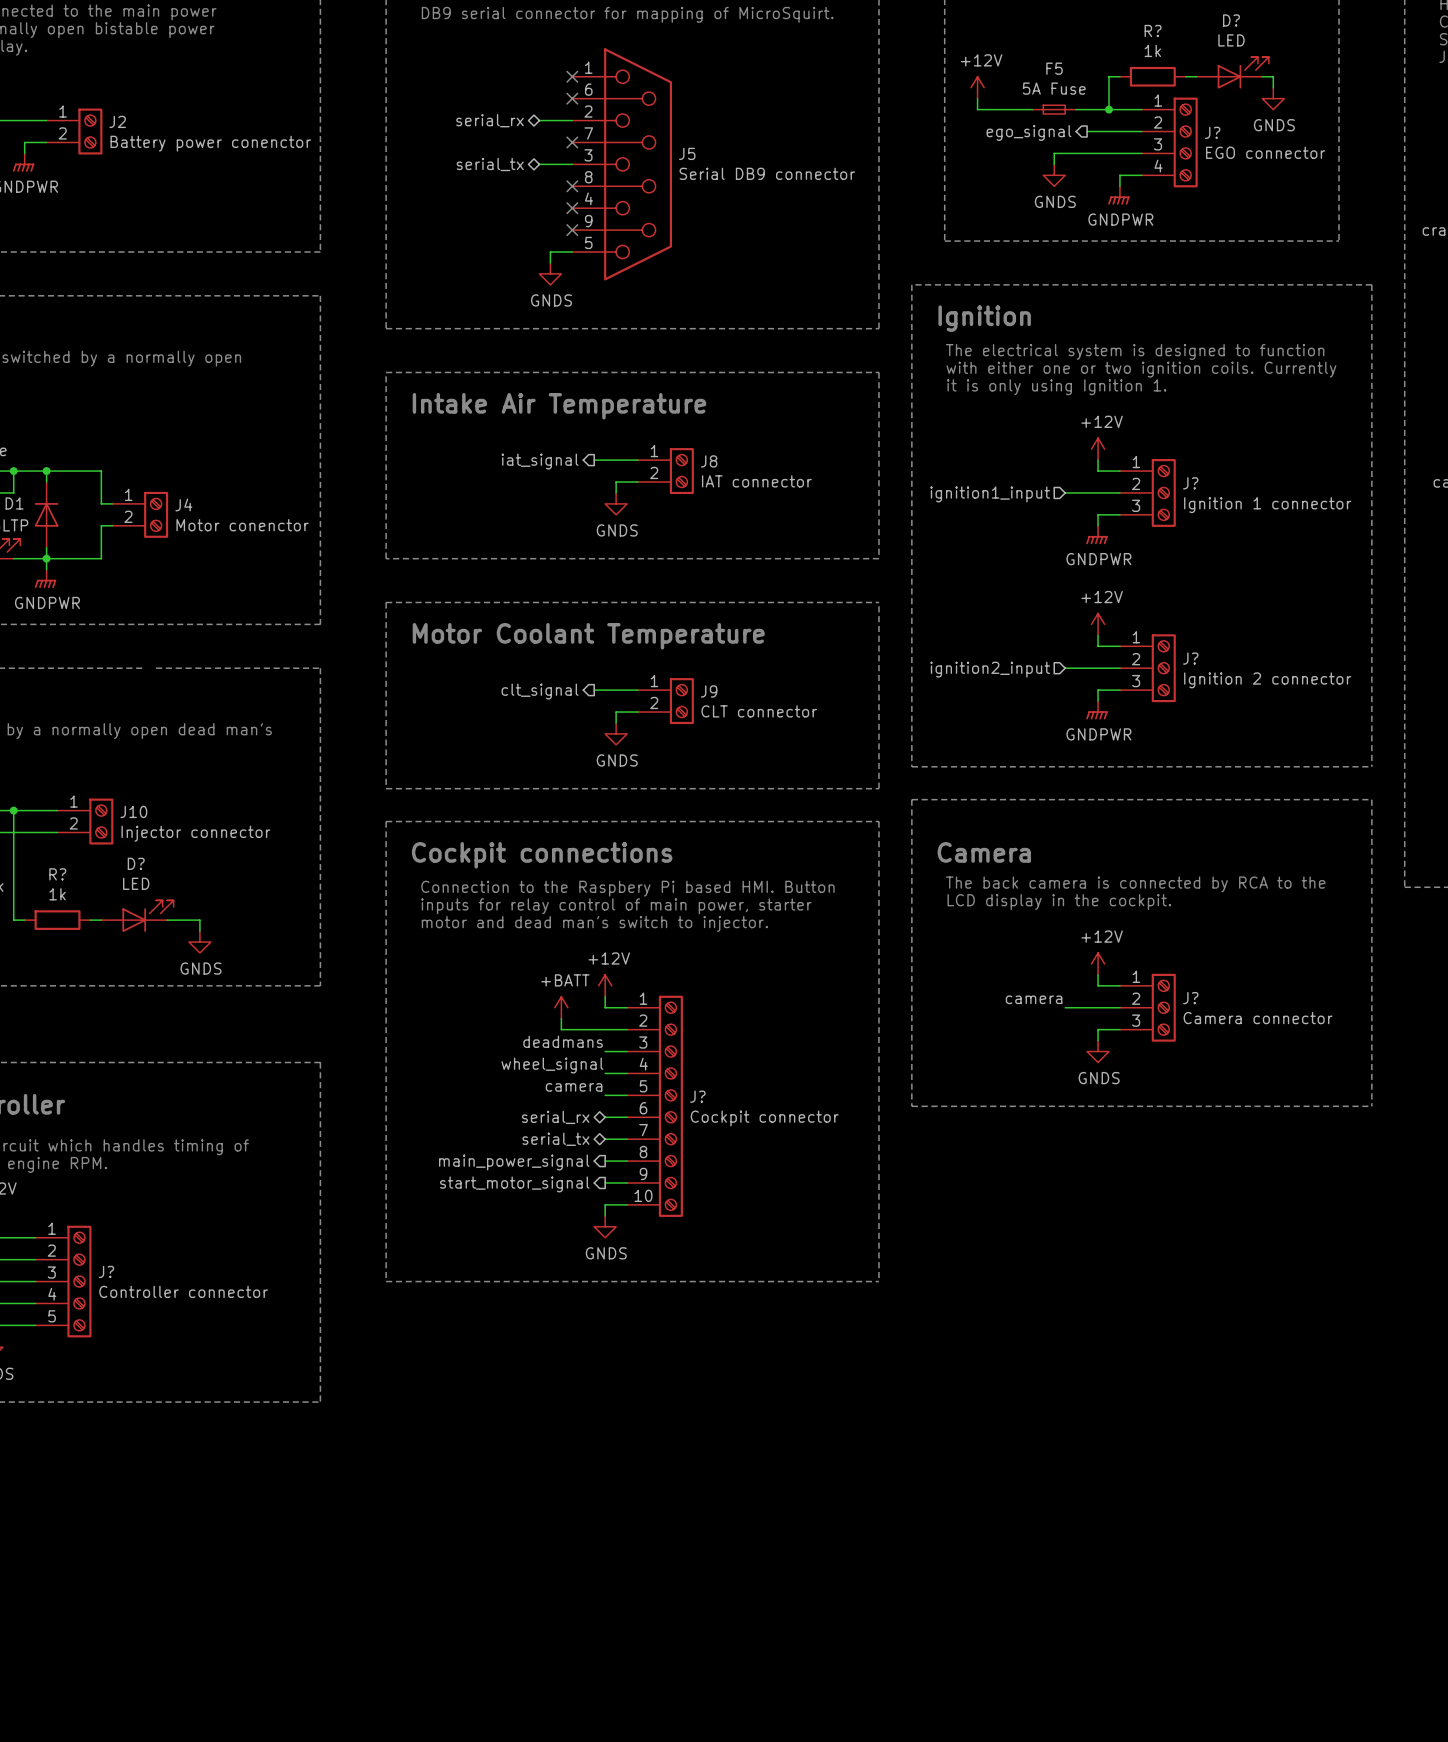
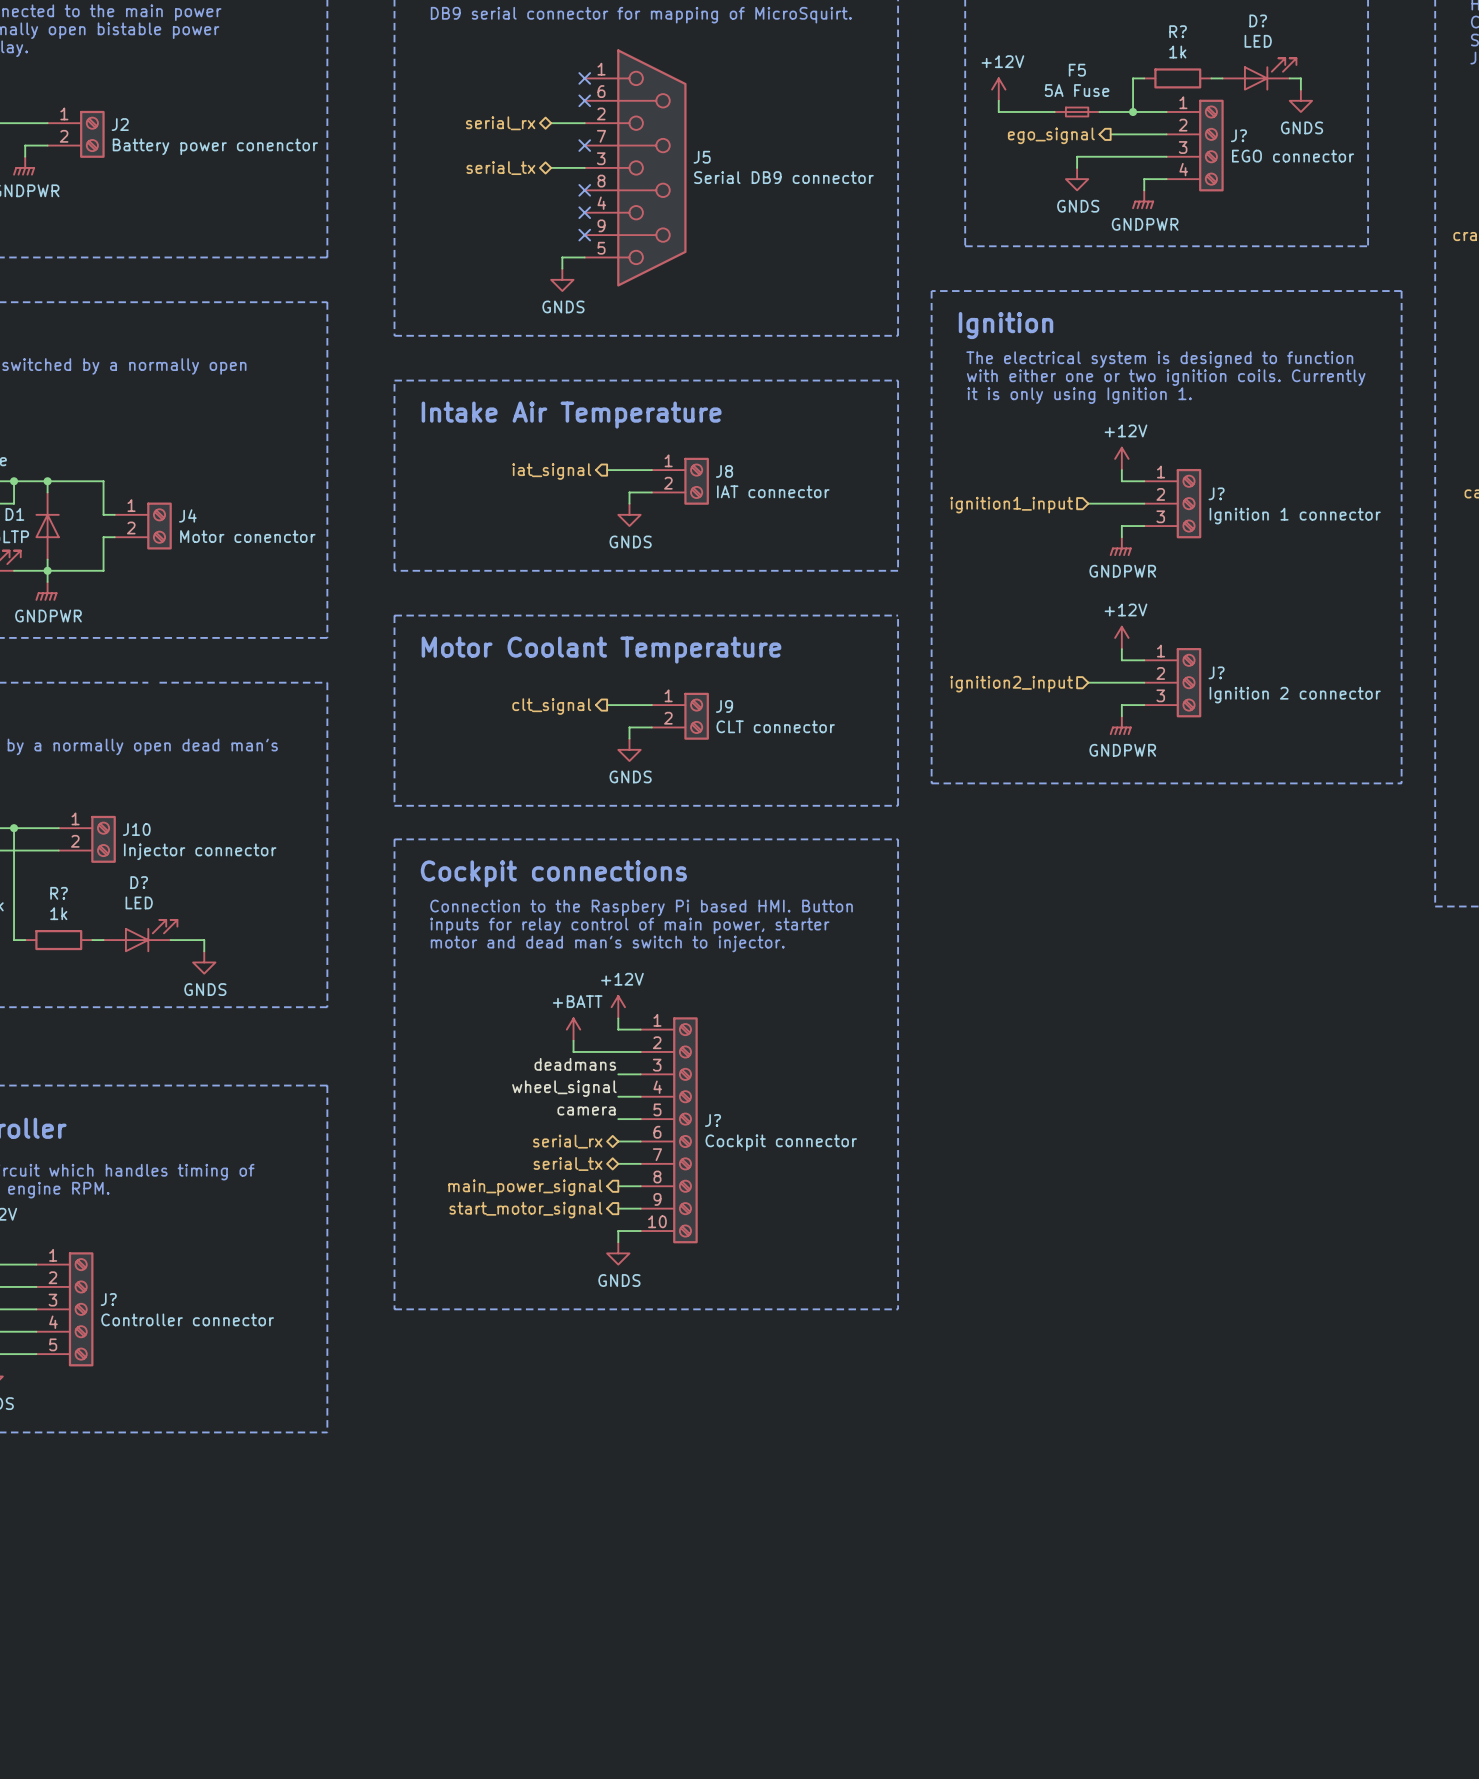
line: (911, 799) (1371, 799) (1371, 1106) (911, 1106) (911, 799) -> none
text: Camera (984, 852) -> none
text: The back camera is connected by RCA to the (1135, 884) -> none
text: LCD display in the cockpit. (1059, 902) -> none
power symbol: +12V (1098, 963) -> none
wire: (1098, 974) (1098, 985) (1119, 985) -> none
label: camera (1034, 999) -> none
wire: (1065, 1007) (1119, 1007) -> none
J?: Camera connector (1147, 1007) -> none
wire: (1119, 1029) (1098, 1029) (1098, 1040) -> none
power symbol: GNDS (1098, 1051) -> none

